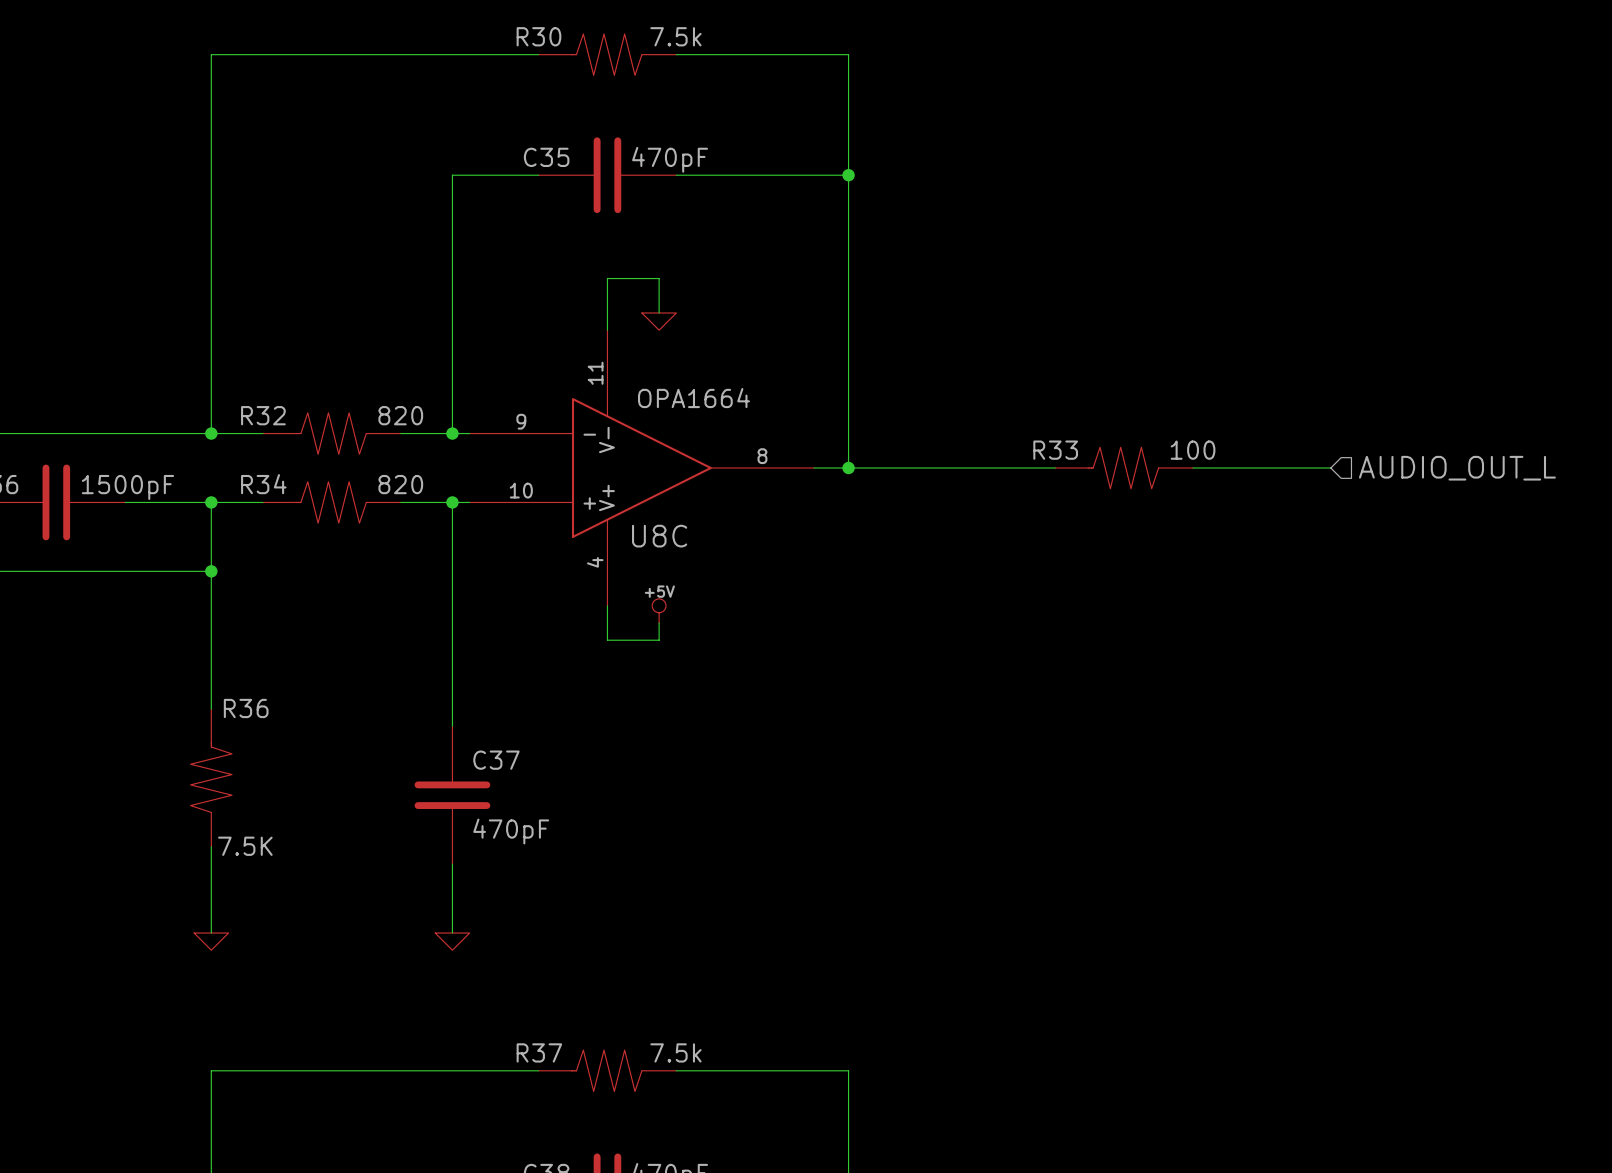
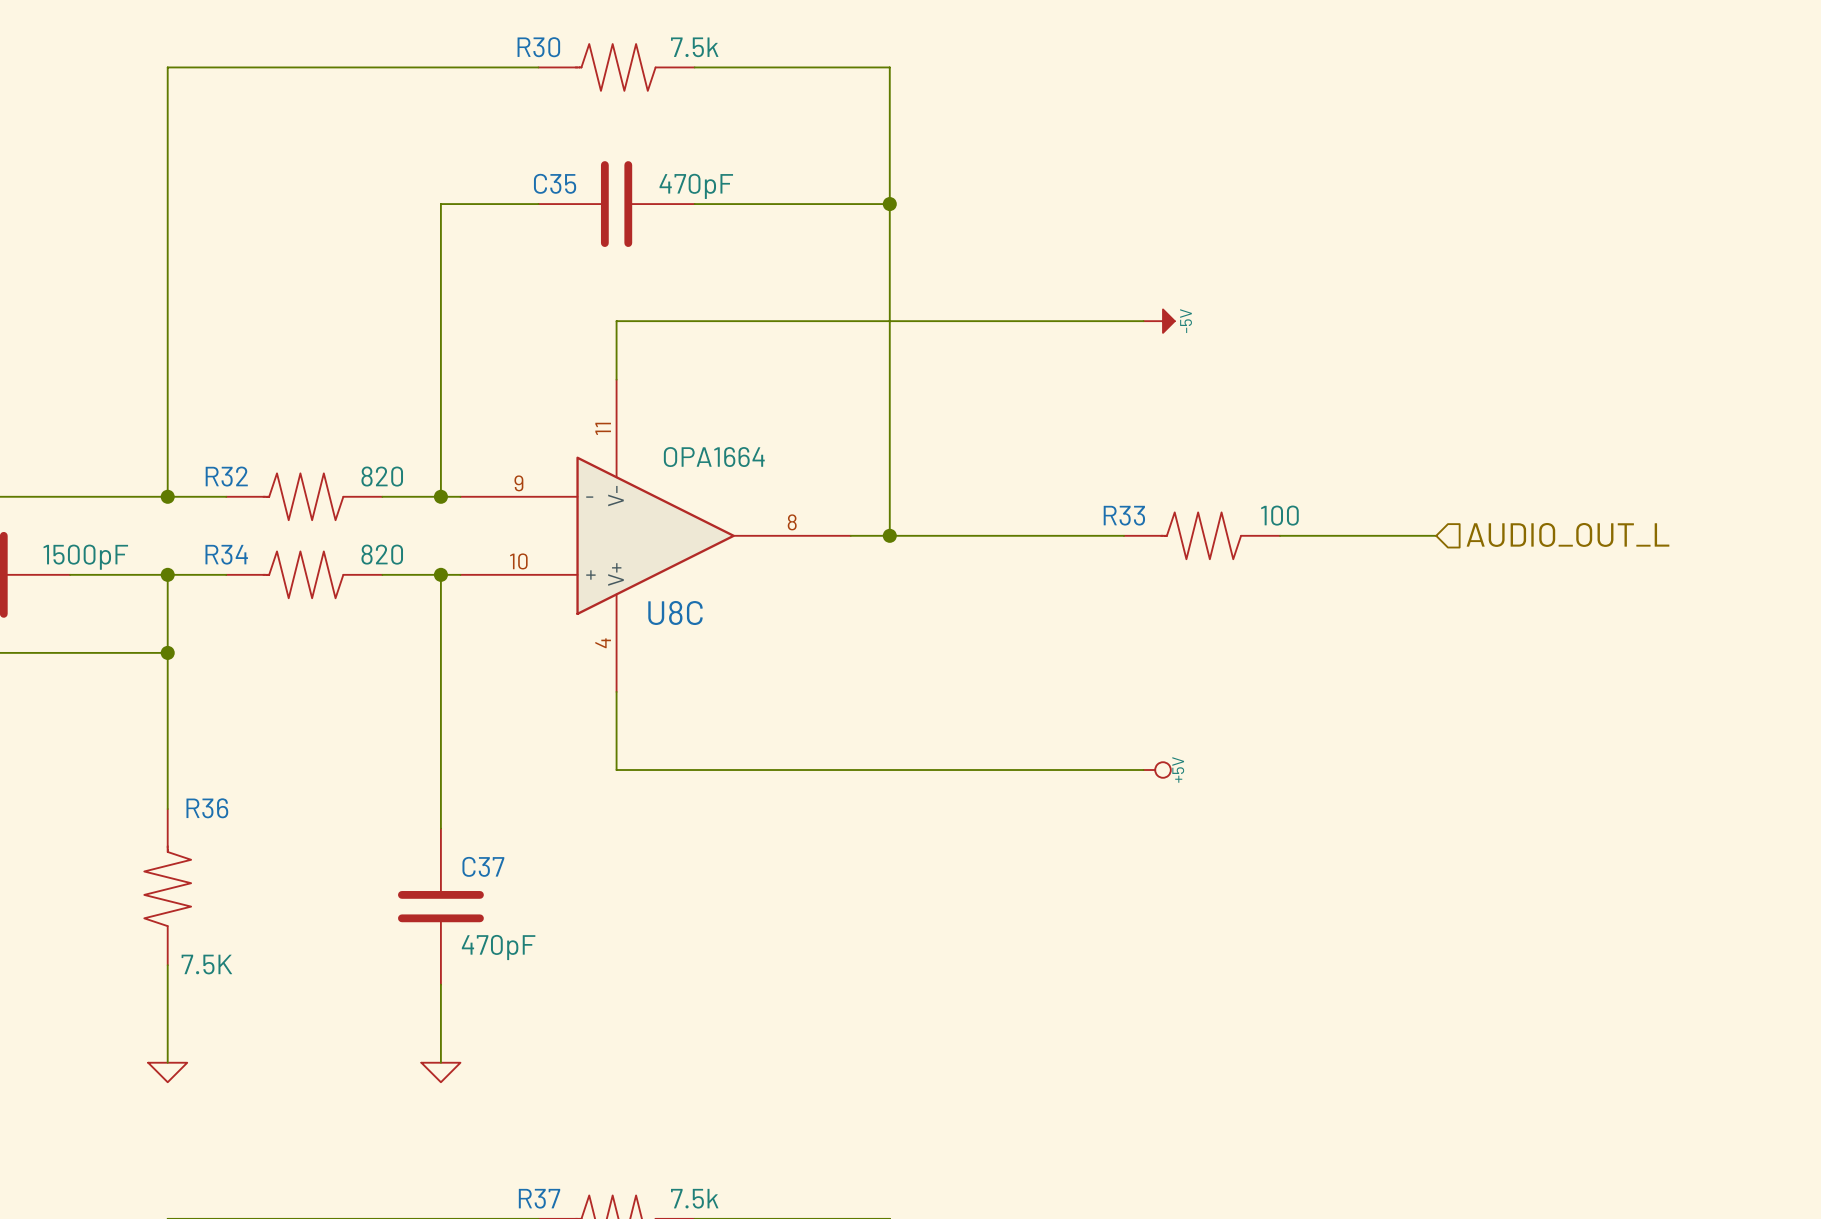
wire: (659, 278) (659, 312) -> (675, 321) (1143, 321)
power symbol: none -> -5V (1159, 321)
power symbol: (659, 321) -> none
power symbol: +5V (659, 610) -> none
wire: (659, 623) (659, 640) (607, 640) -> (1143, 770) (616, 770) (616, 730)
power symbol: none -> +5V (1157, 770)

